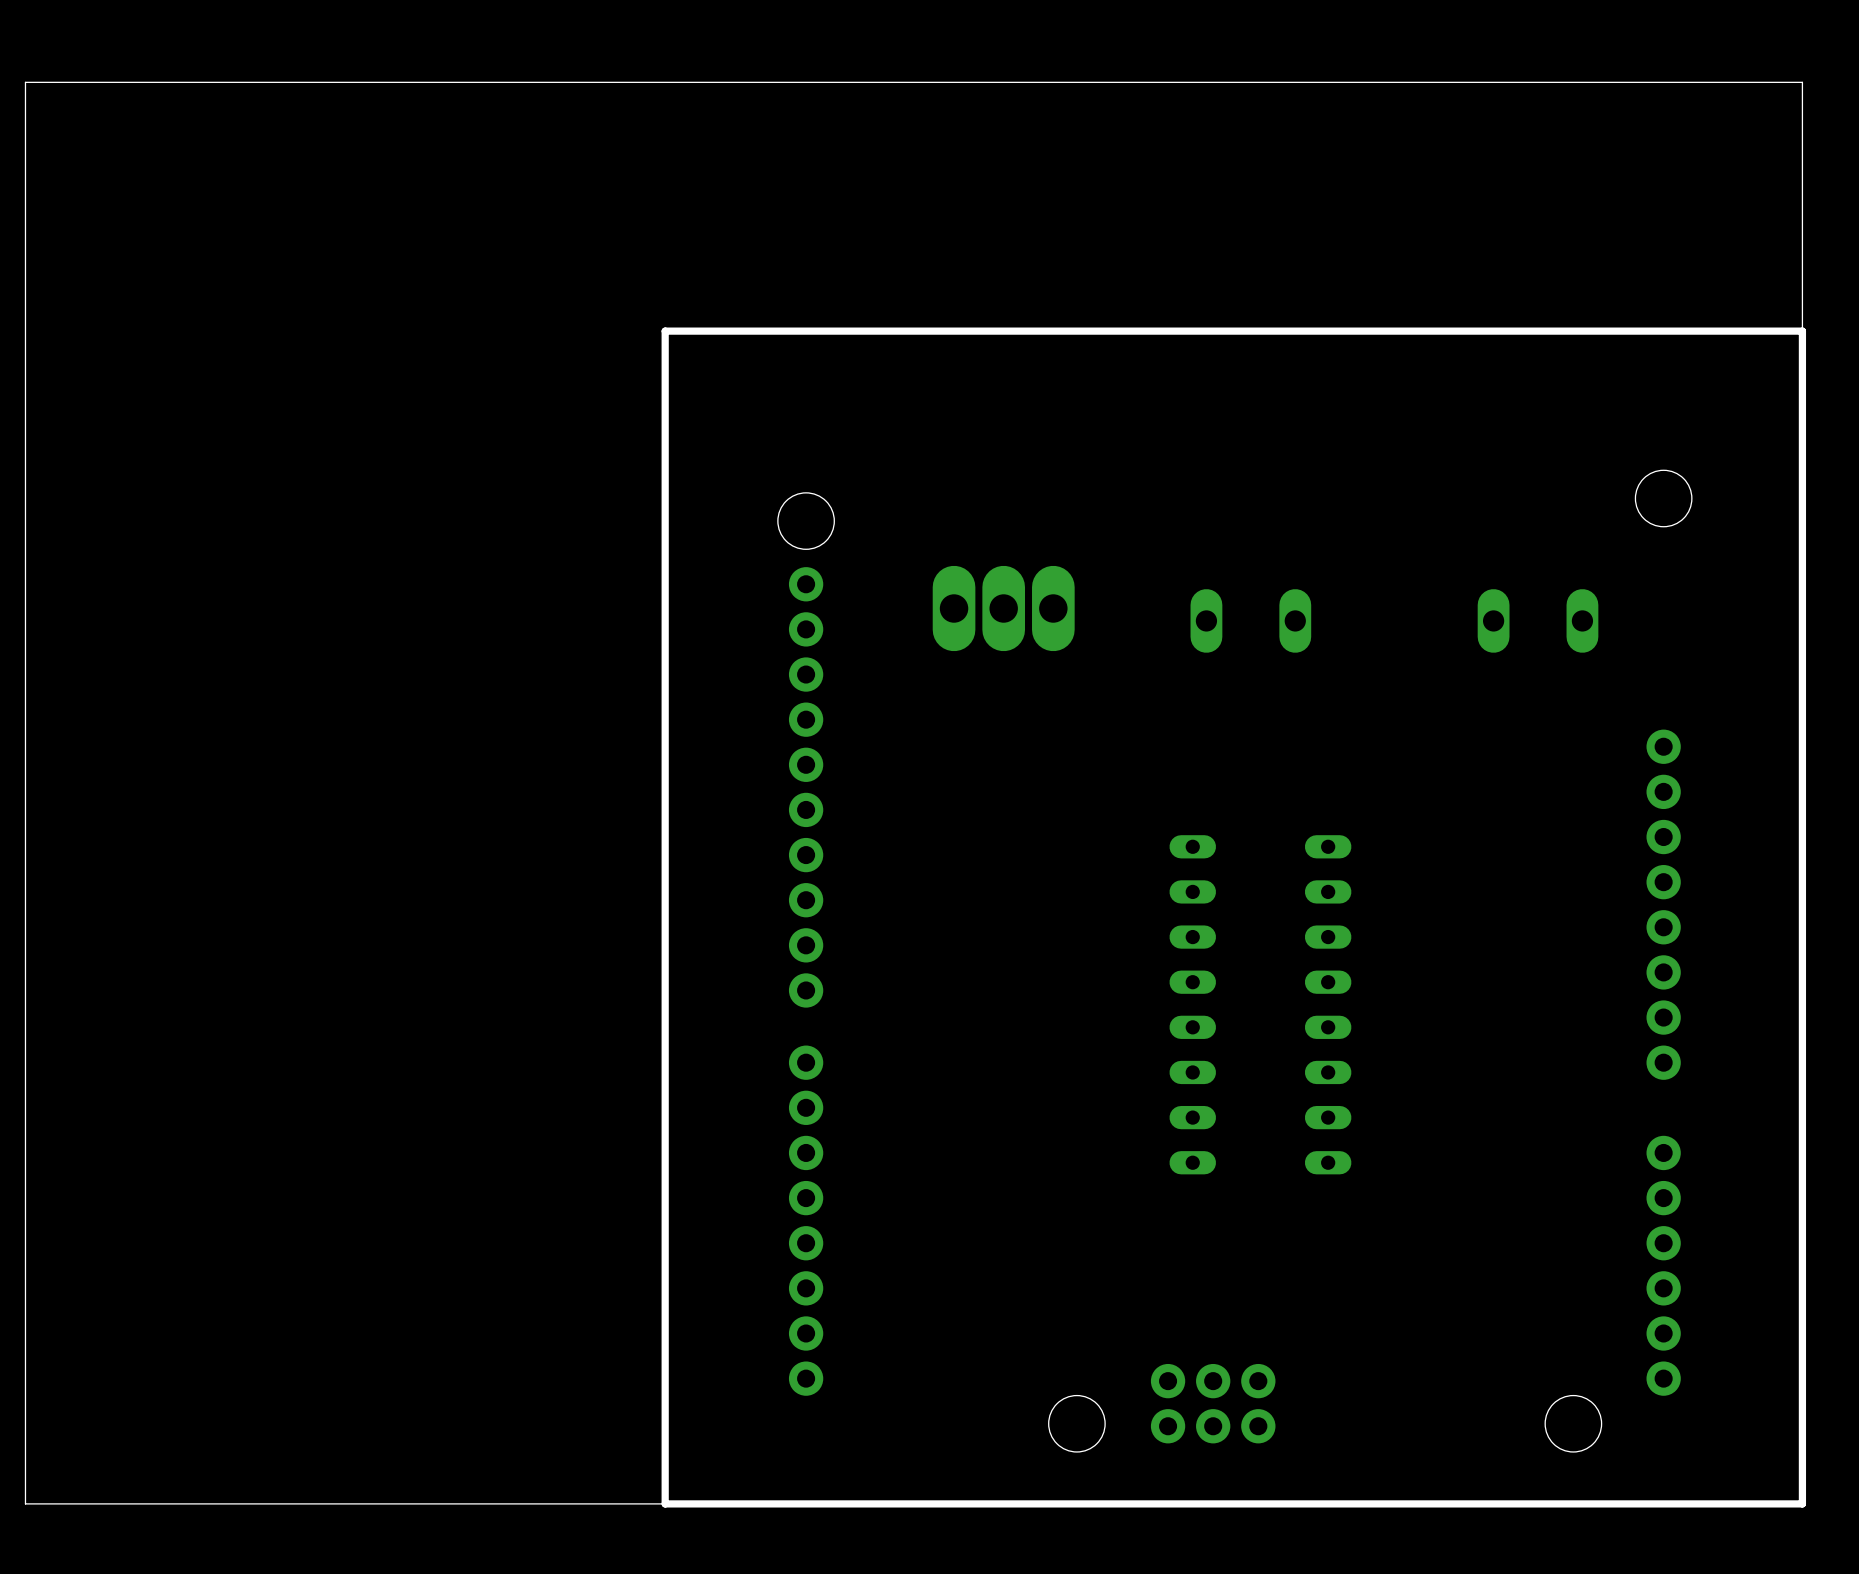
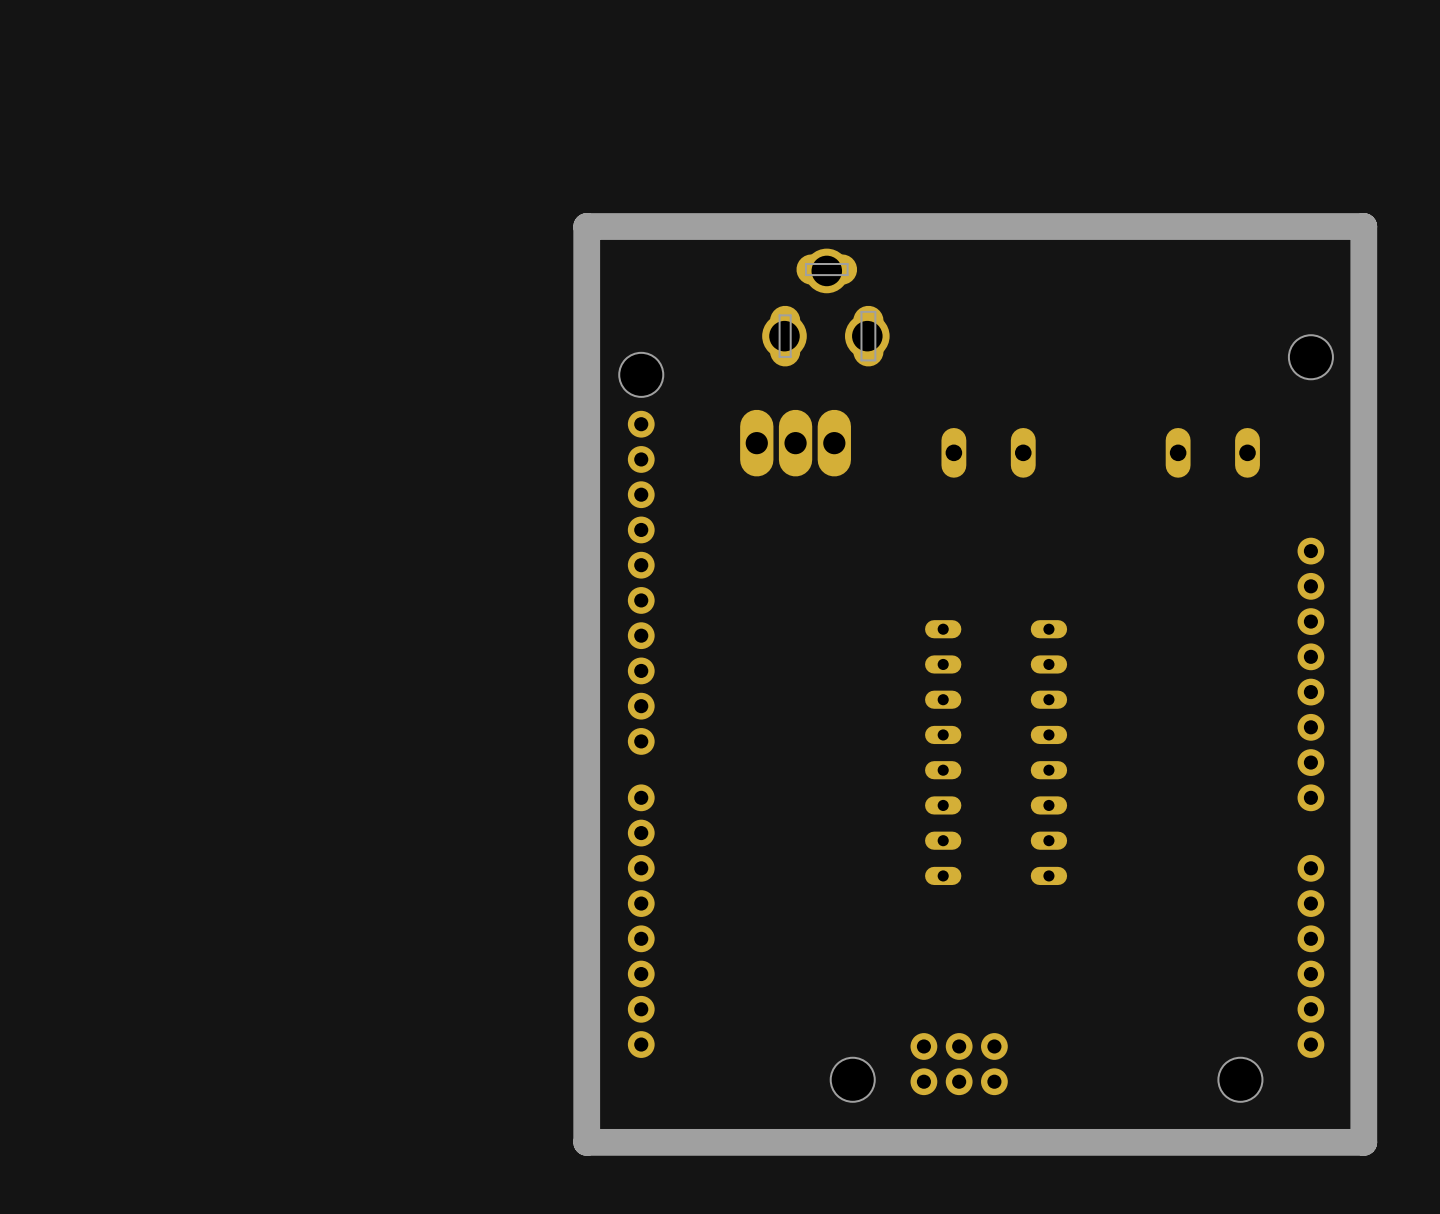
board edge: (736, 331) (665, 331) (665, 1503) -> (586, 226) (586, 1142)
board edge width: thin (1731, 331) (736, 331) -> thick (1363, 226) (586, 226)
board edge: (1802, 331) (1802, 1503) (1731, 1503) -> (1363, 226) (1363, 1142)
board edge: (1802, 331) (1802, 82) (25, 82) (25, 1503) (665, 1503) -> none
board edge: (1802, 331) (1731, 331) -> none
part: none -> (825, 307)
board edge: (736, 1503) (665, 1503) -> none
board edge width: thin (1731, 1503) (736, 1503) -> thick (1363, 1142) (586, 1142)

